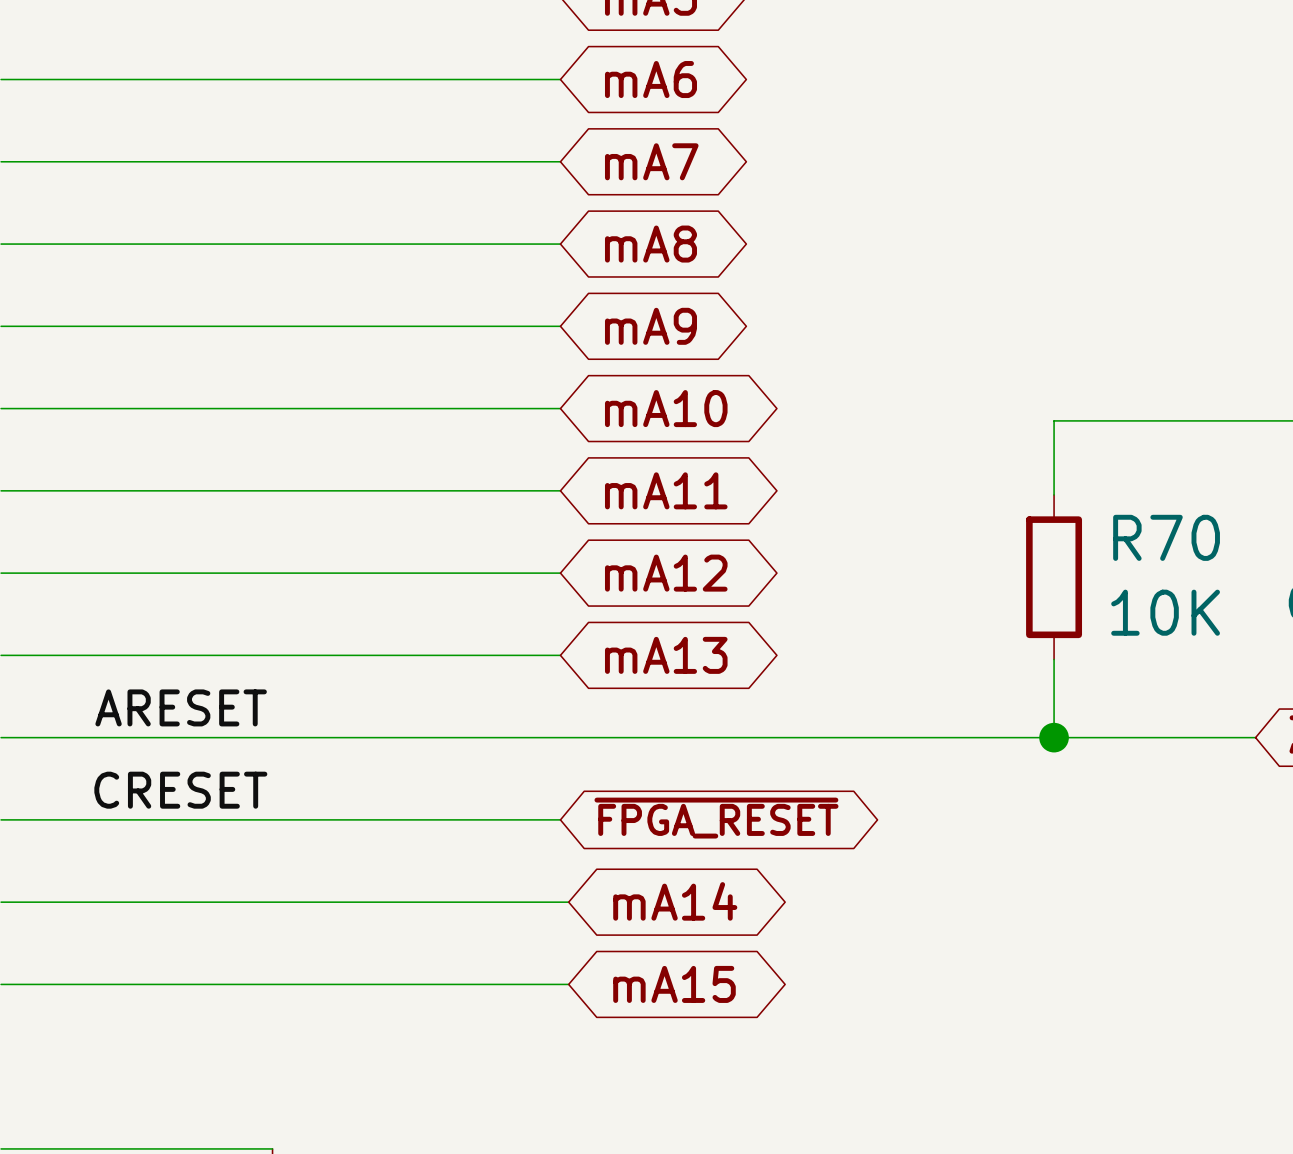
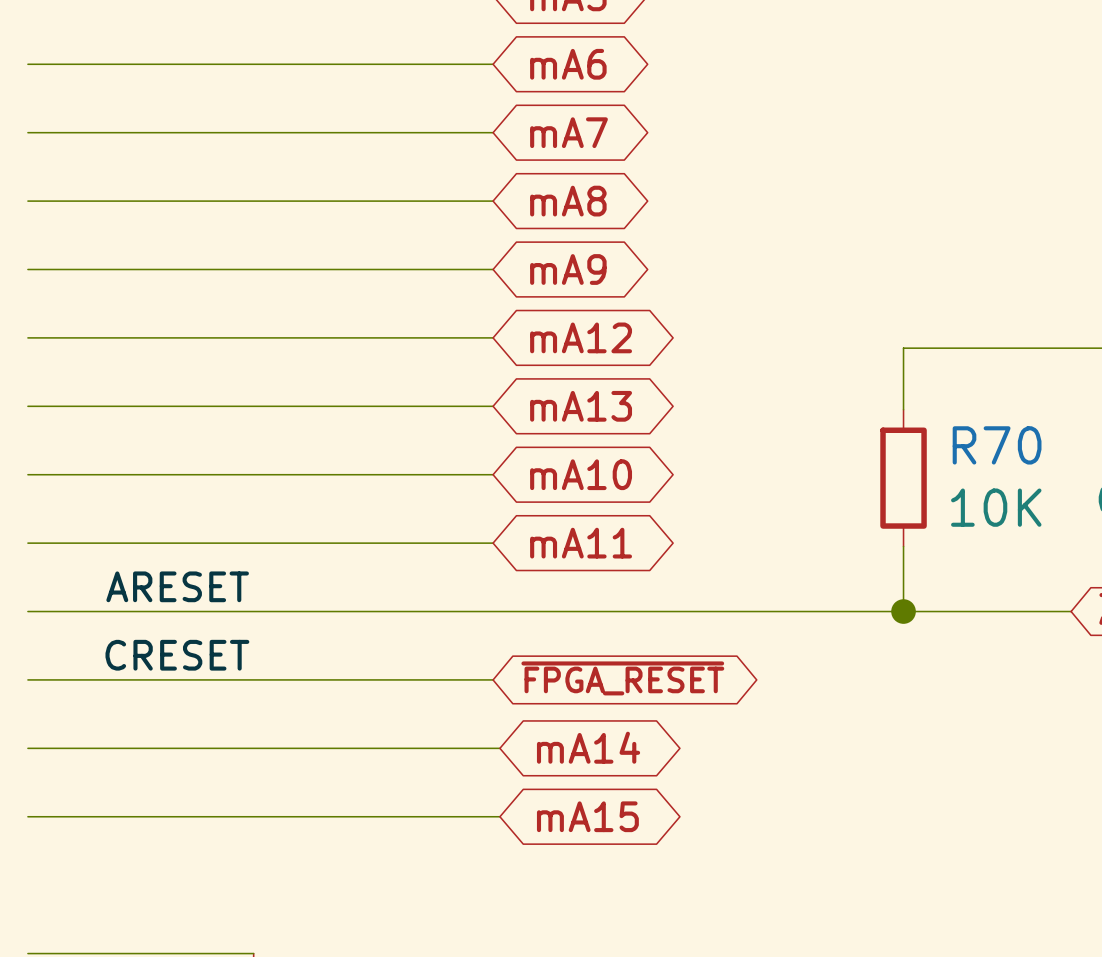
global label: mA10 (666, 408) -> mA12 (581, 337)
global label: mA11 (666, 490) -> mA13 (581, 406)
global label: mA12 (666, 573) -> mA10 (581, 474)
global label: mA13 (666, 655) -> mA11 (581, 543)

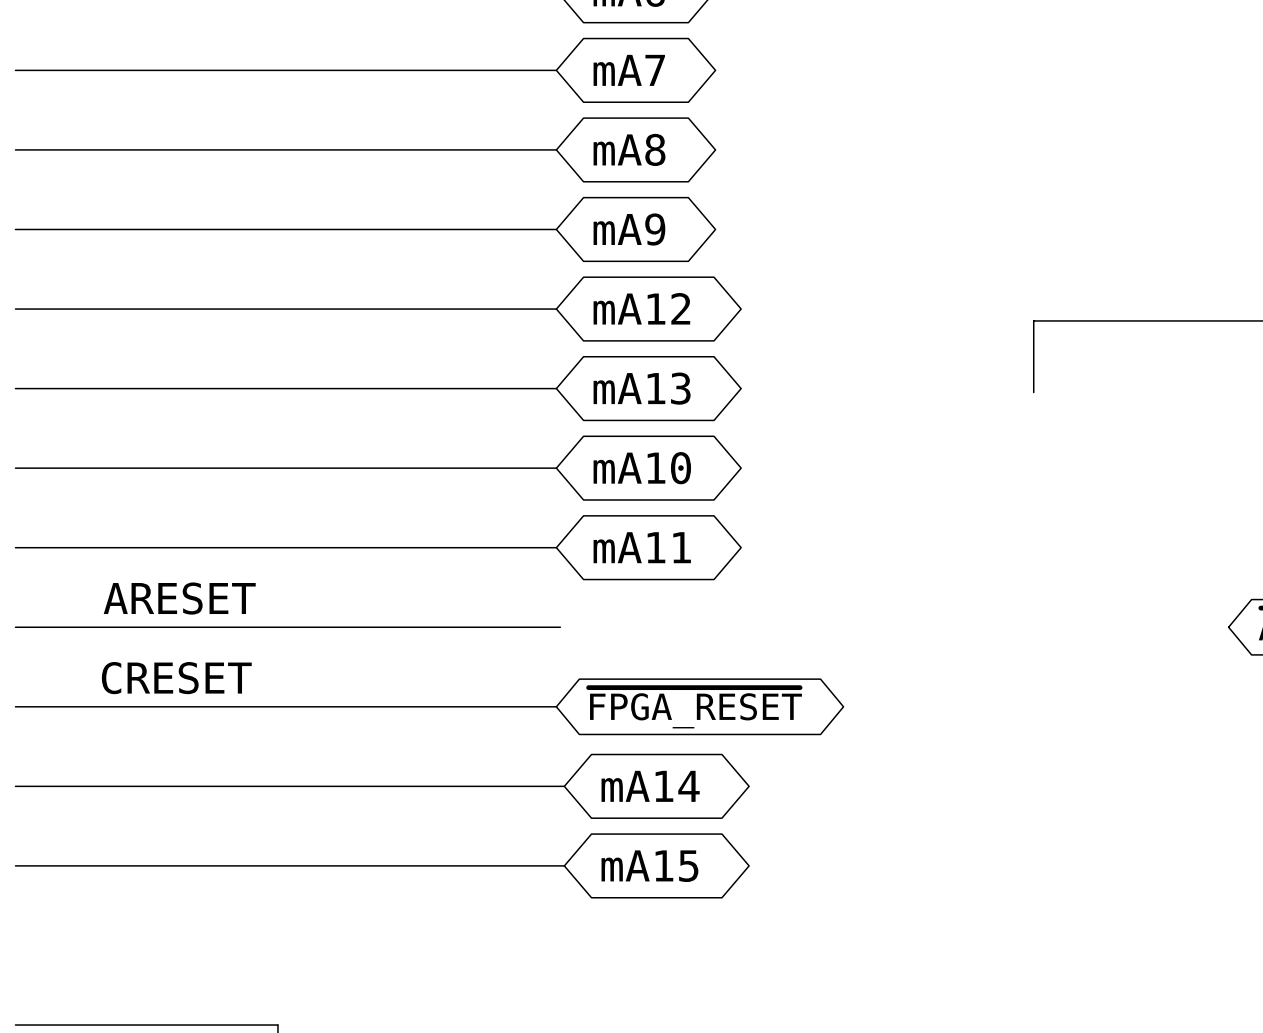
R70: 10K (903, 478) -> none
wire: (903, 546) (903, 611) -> none
wire: (496, 611) (1071, 611) -> none
junction: (903, 611) -> none

